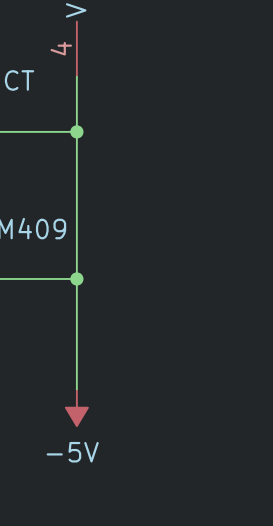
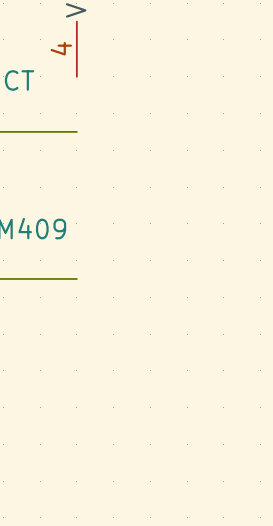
wire: (76, 76) (76, 389) -> none
junction: (76, 131) -> none
junction: (76, 278) -> none
power symbol: -5V (76, 407) -> none

